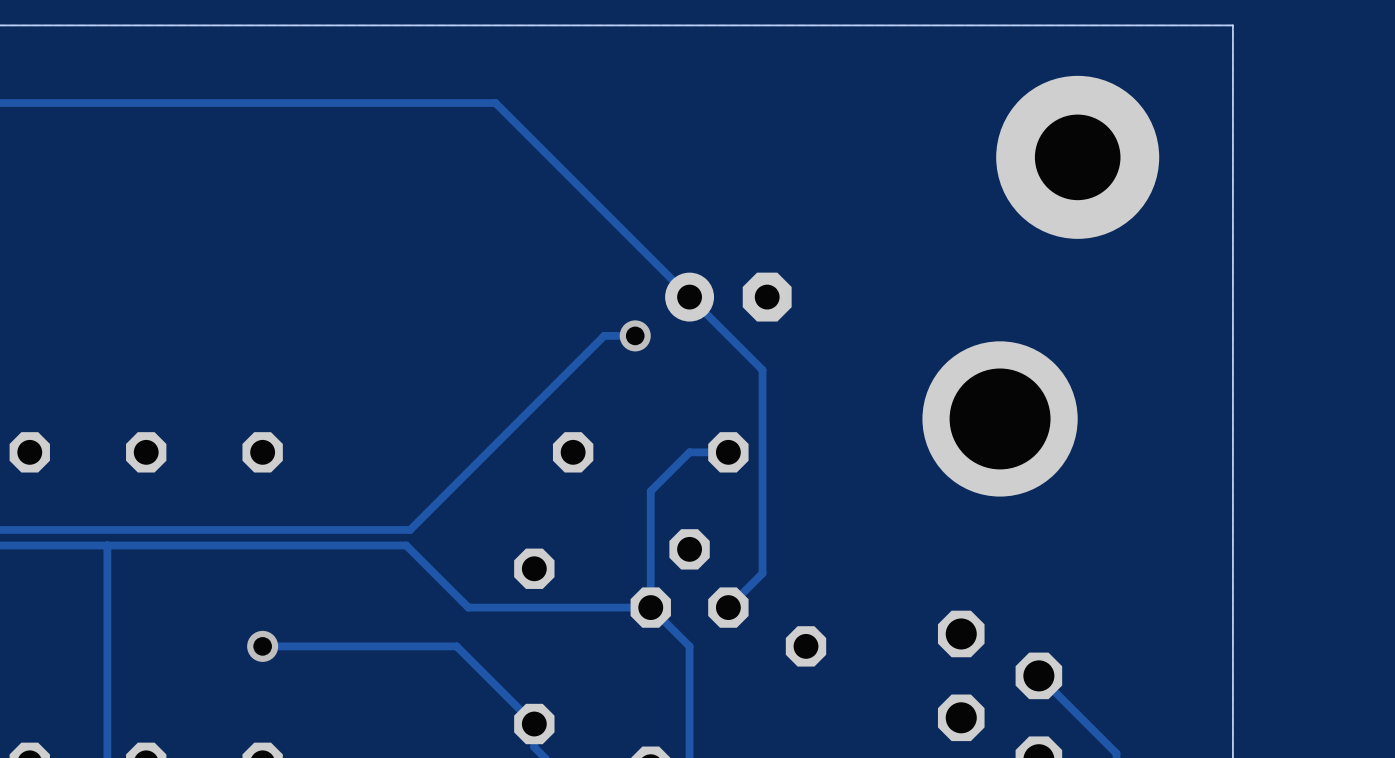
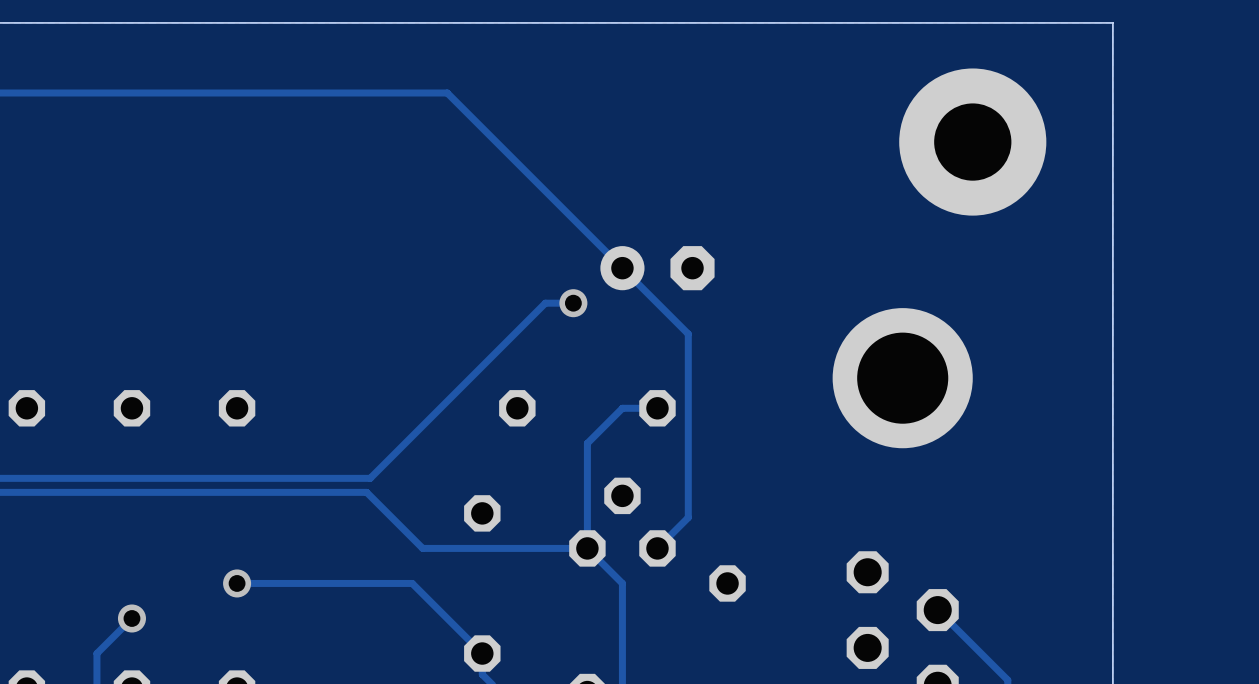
track: (107, 545) (107, 724) -> (131, 618) (96, 653)
via: none -> (131, 618)

